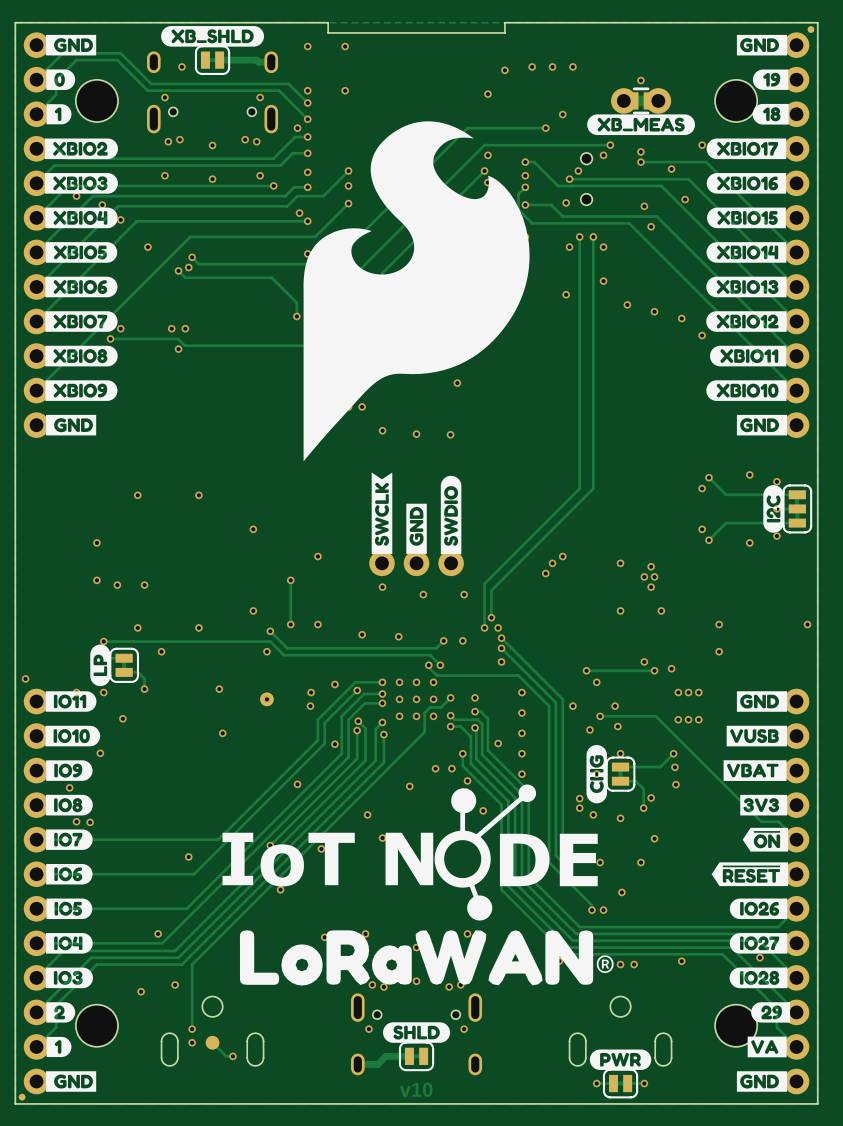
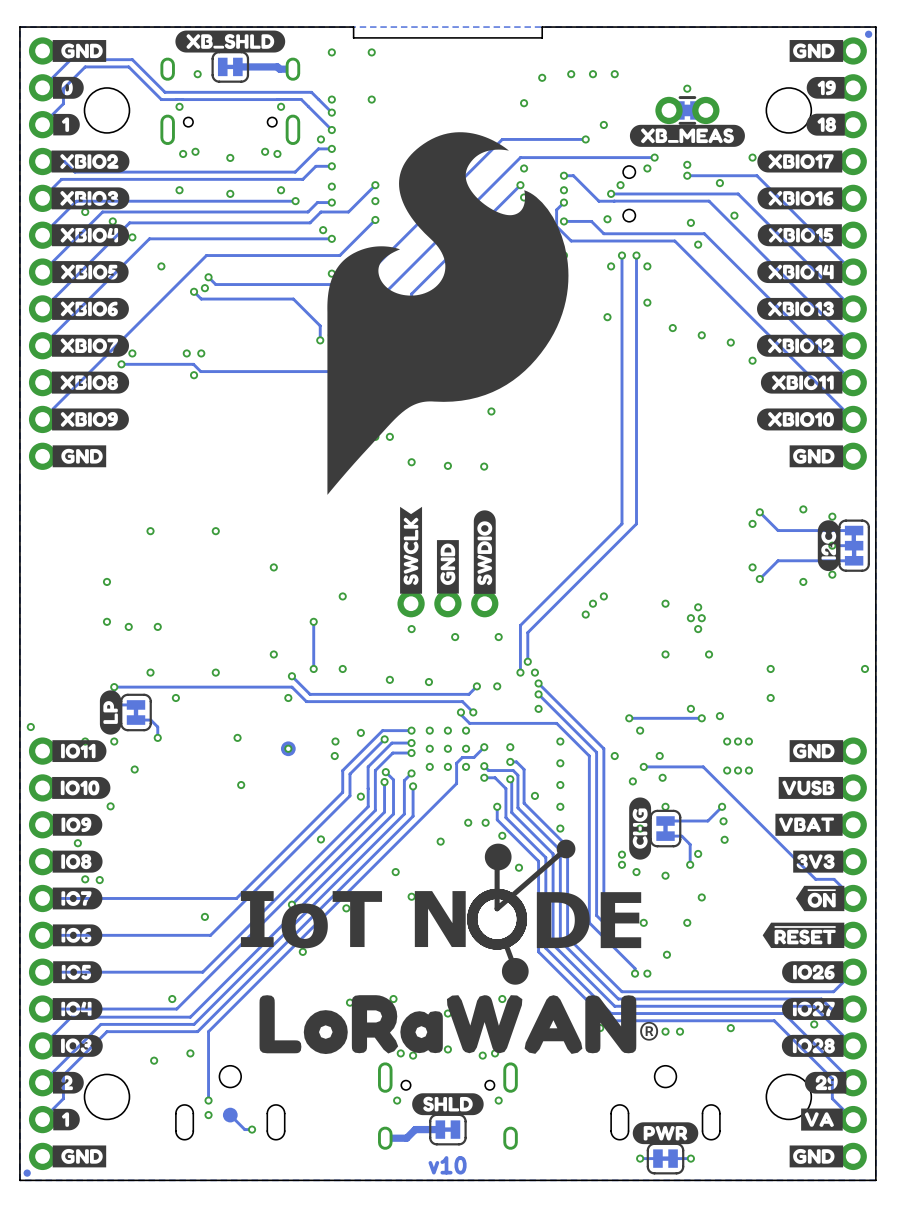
drawing: [434, 790, 530, 911] -> none
line: none -> (566, 848) (497, 908) (497, 856)
line: none -> (498, 893) (507, 896) (515, 902) (520, 910) (521, 920) (519, 930) (513, 937) (505, 942) (495, 944) (486, 942) (478, 936) (473, 927) (472, 917) (474, 908) (480, 900) (488, 895) (498, 893)

